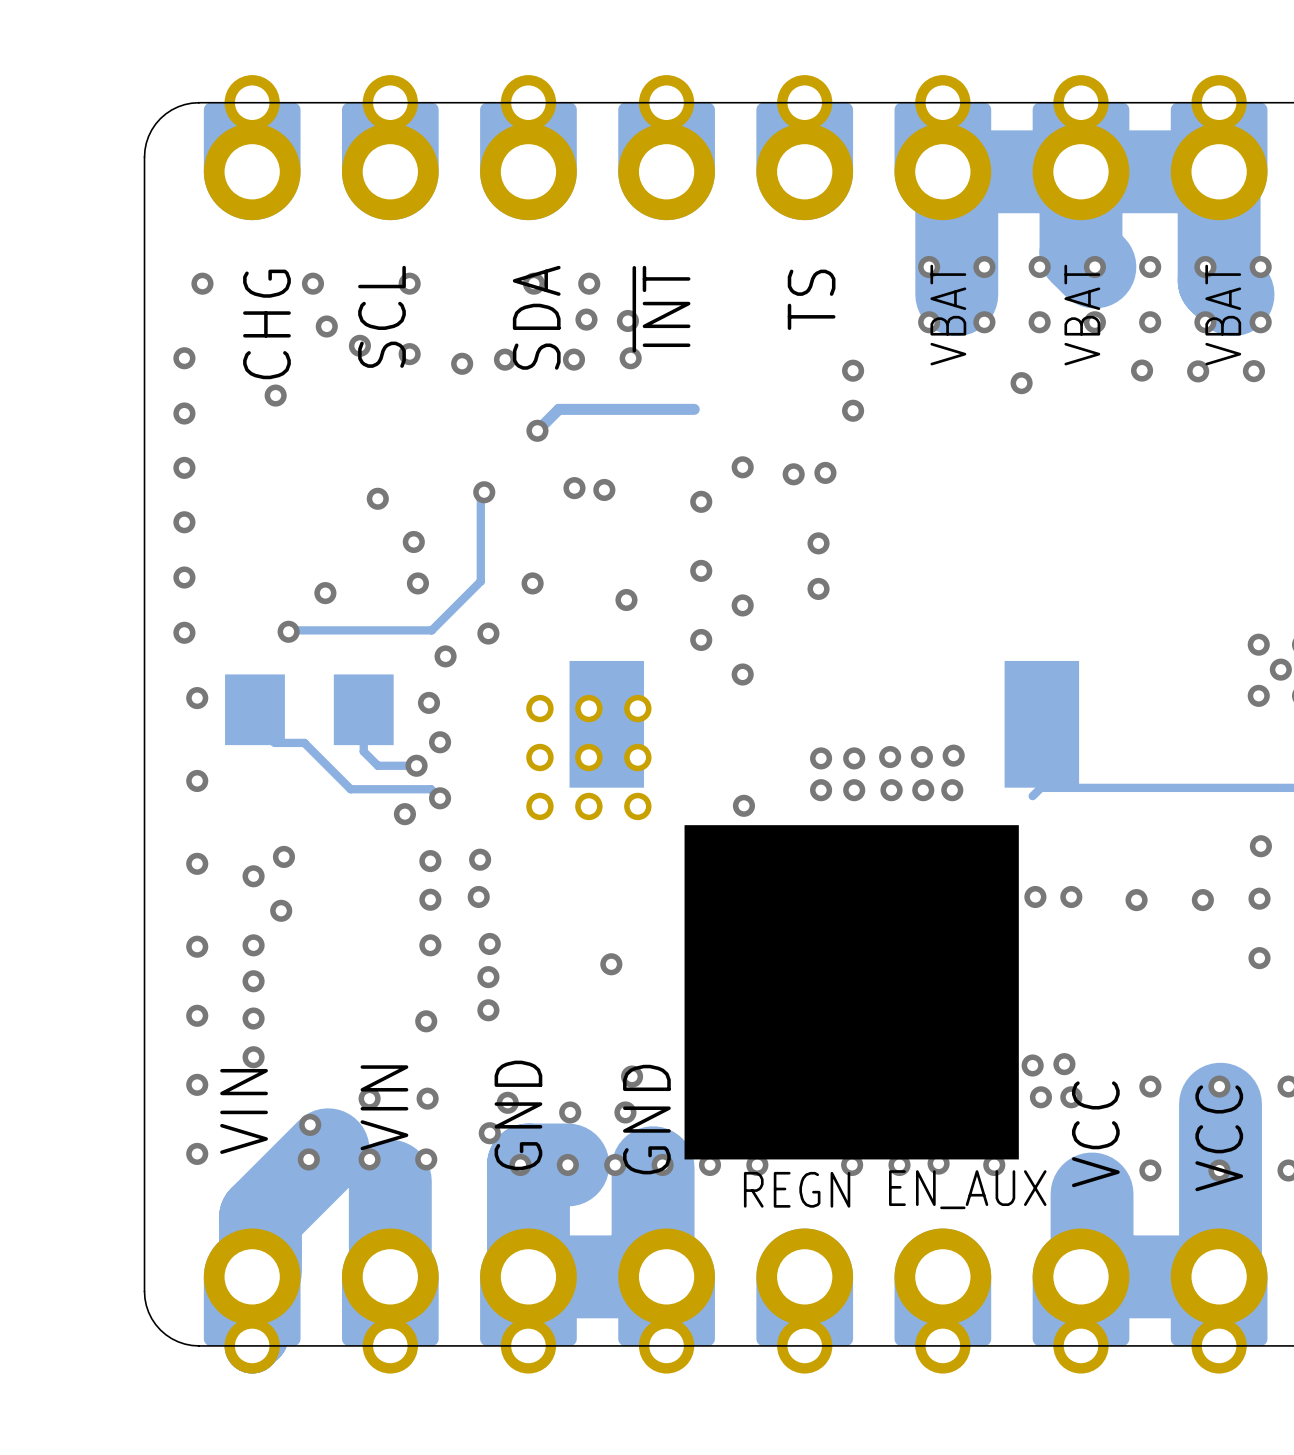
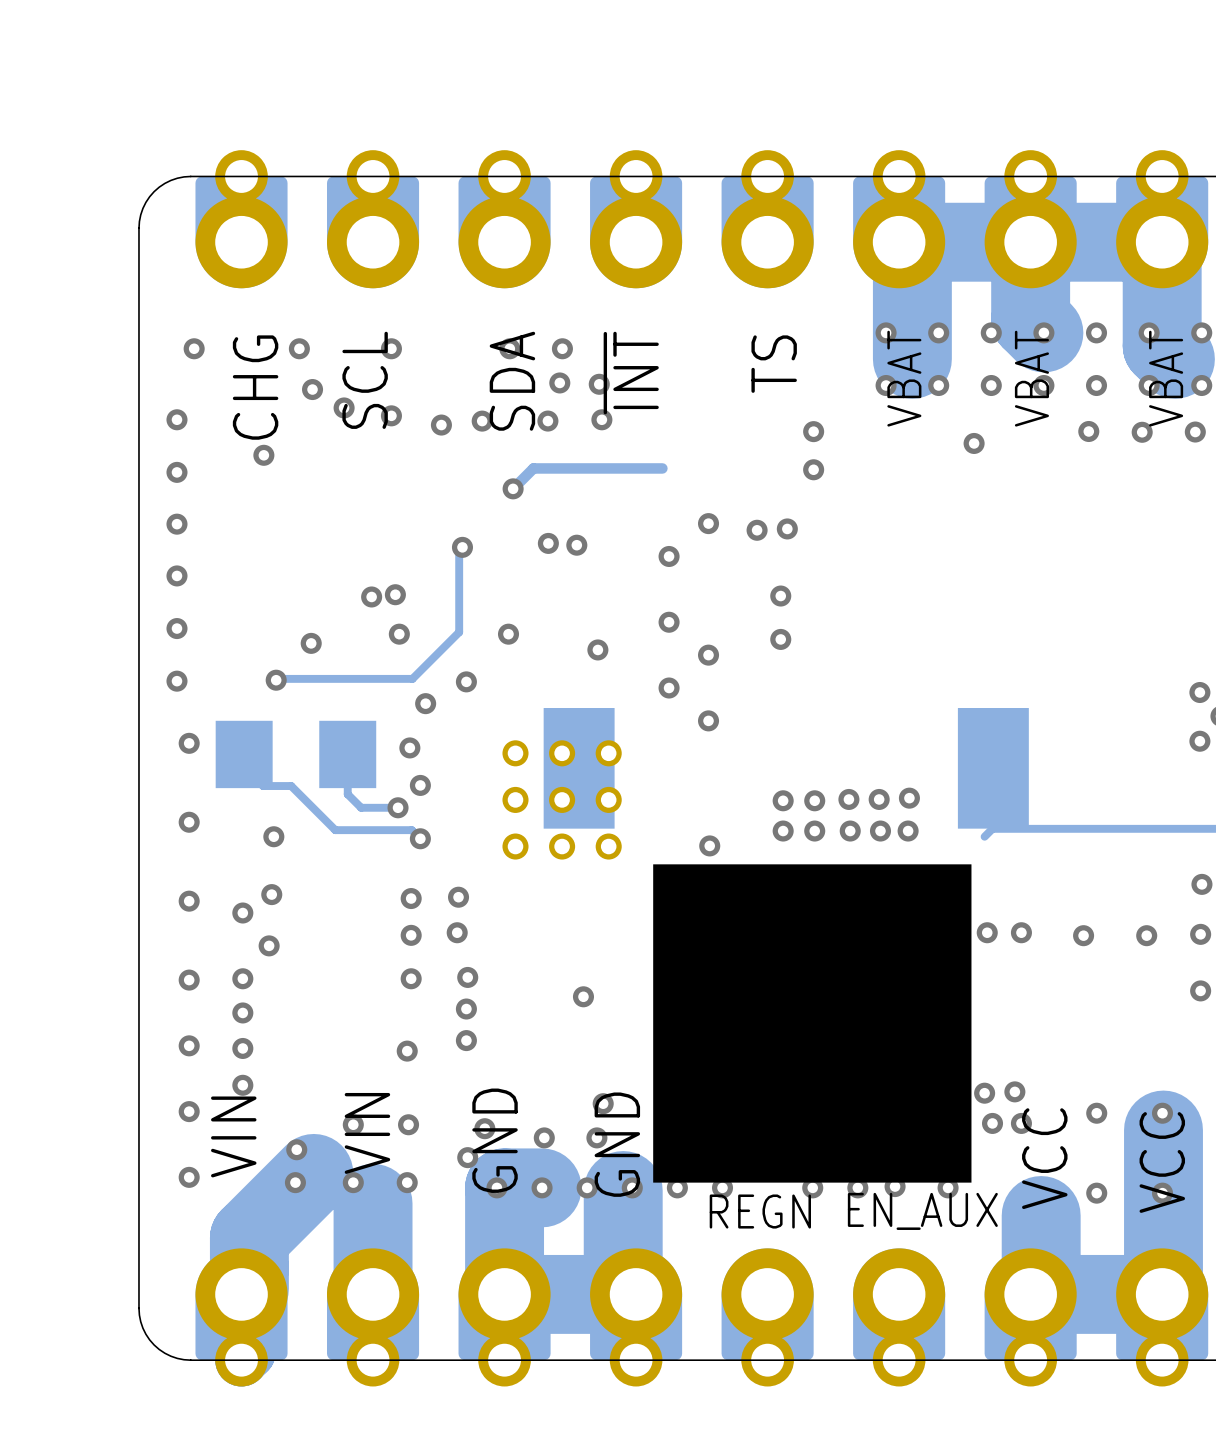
via position: (377, 498) -> (371, 596)
via position: (404, 814) -> (273, 836)

